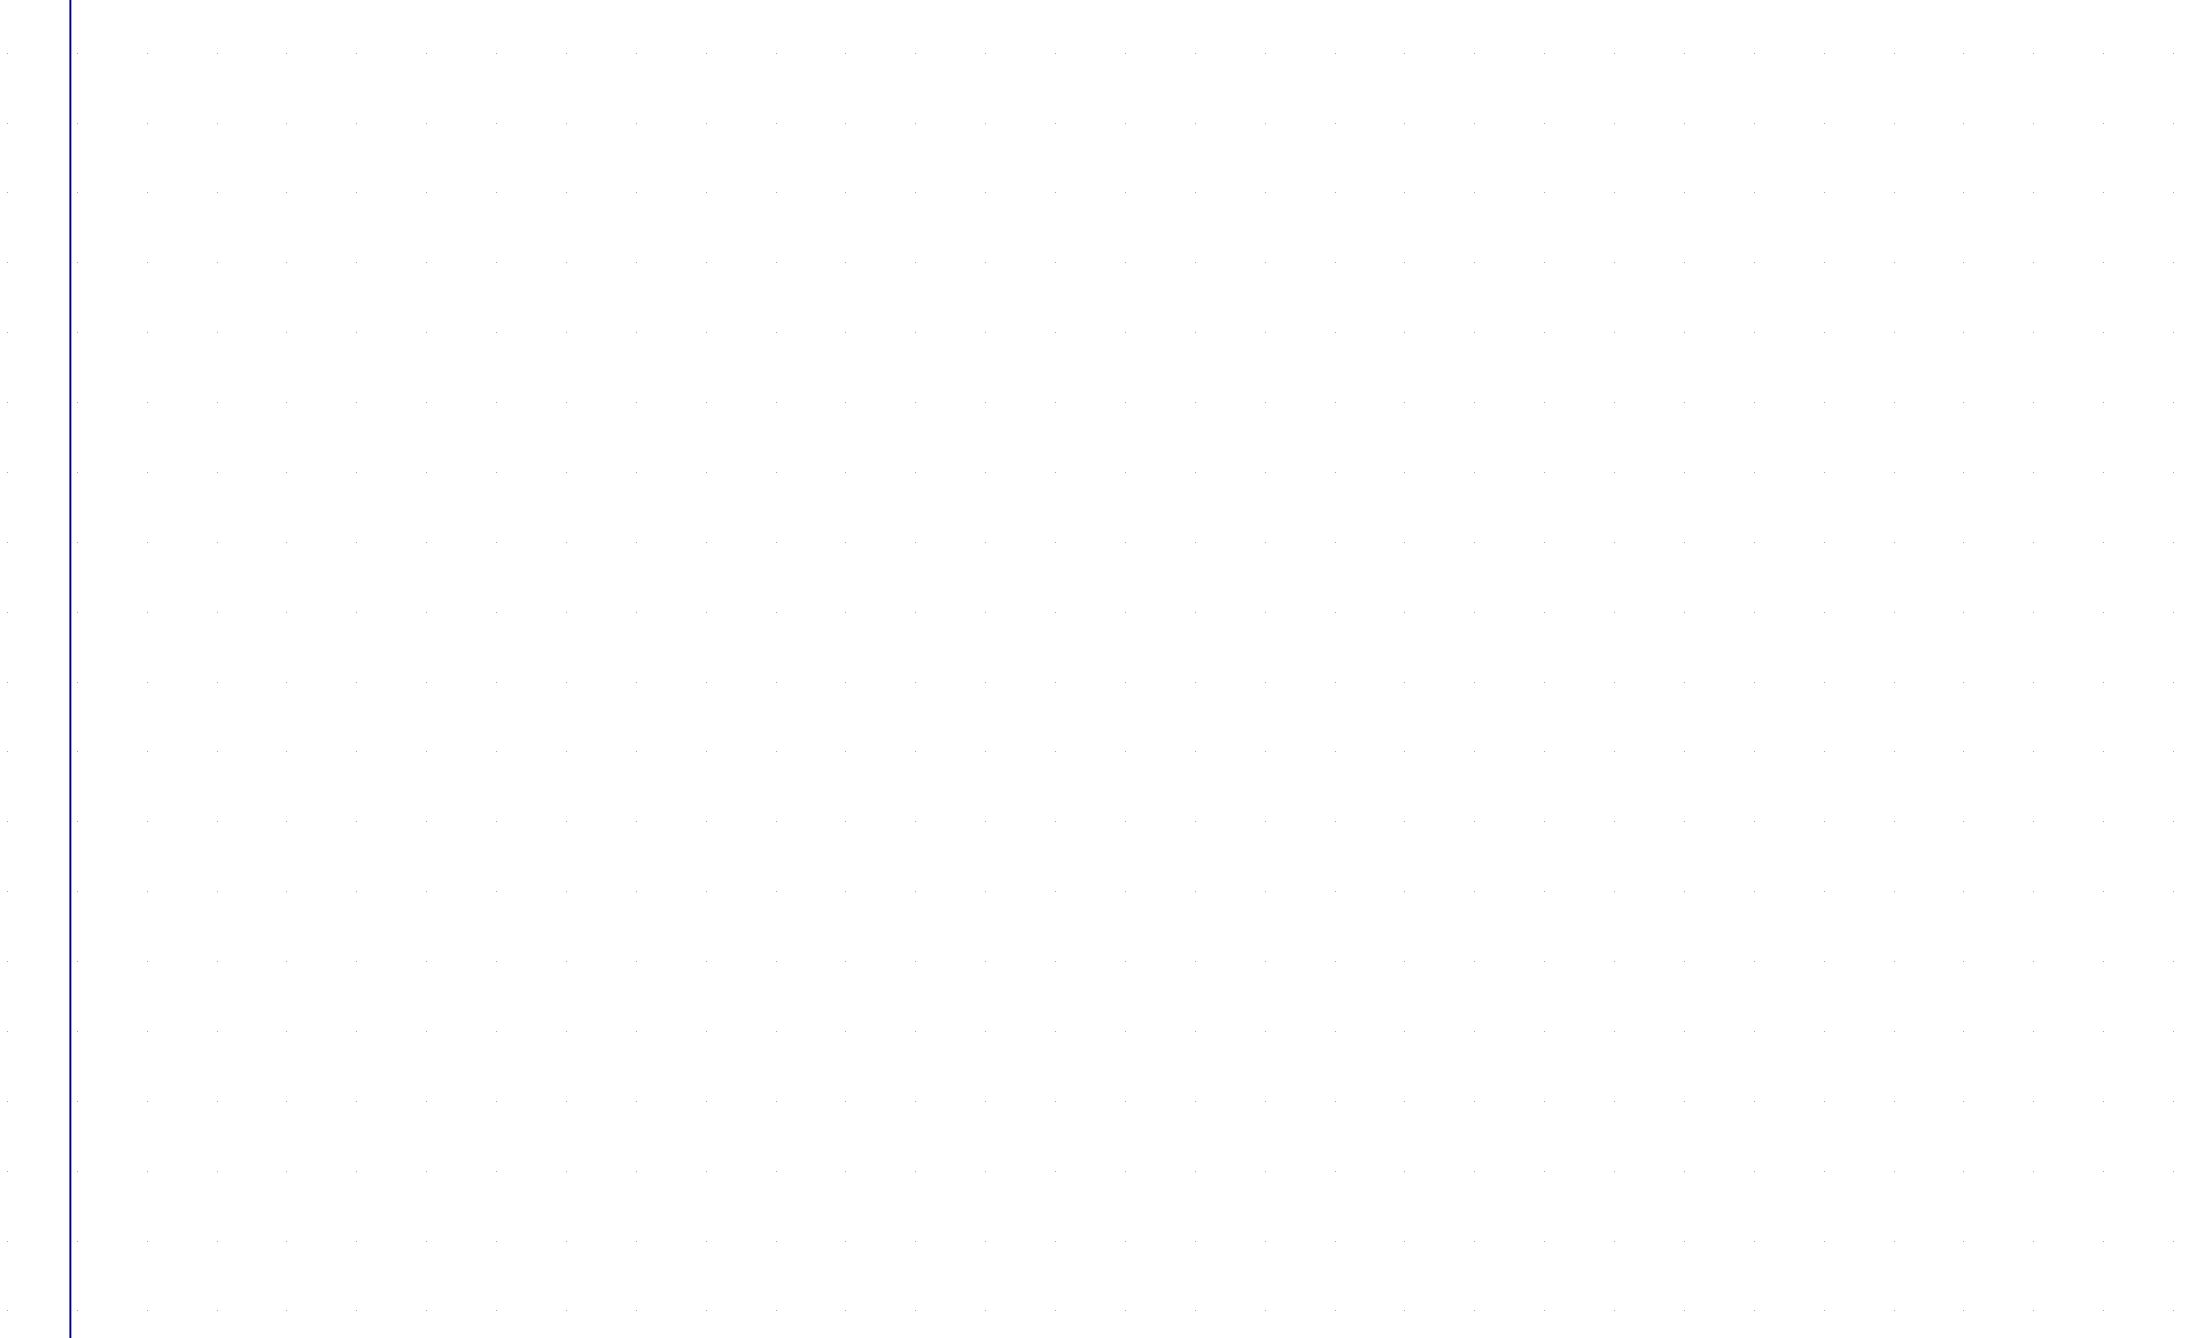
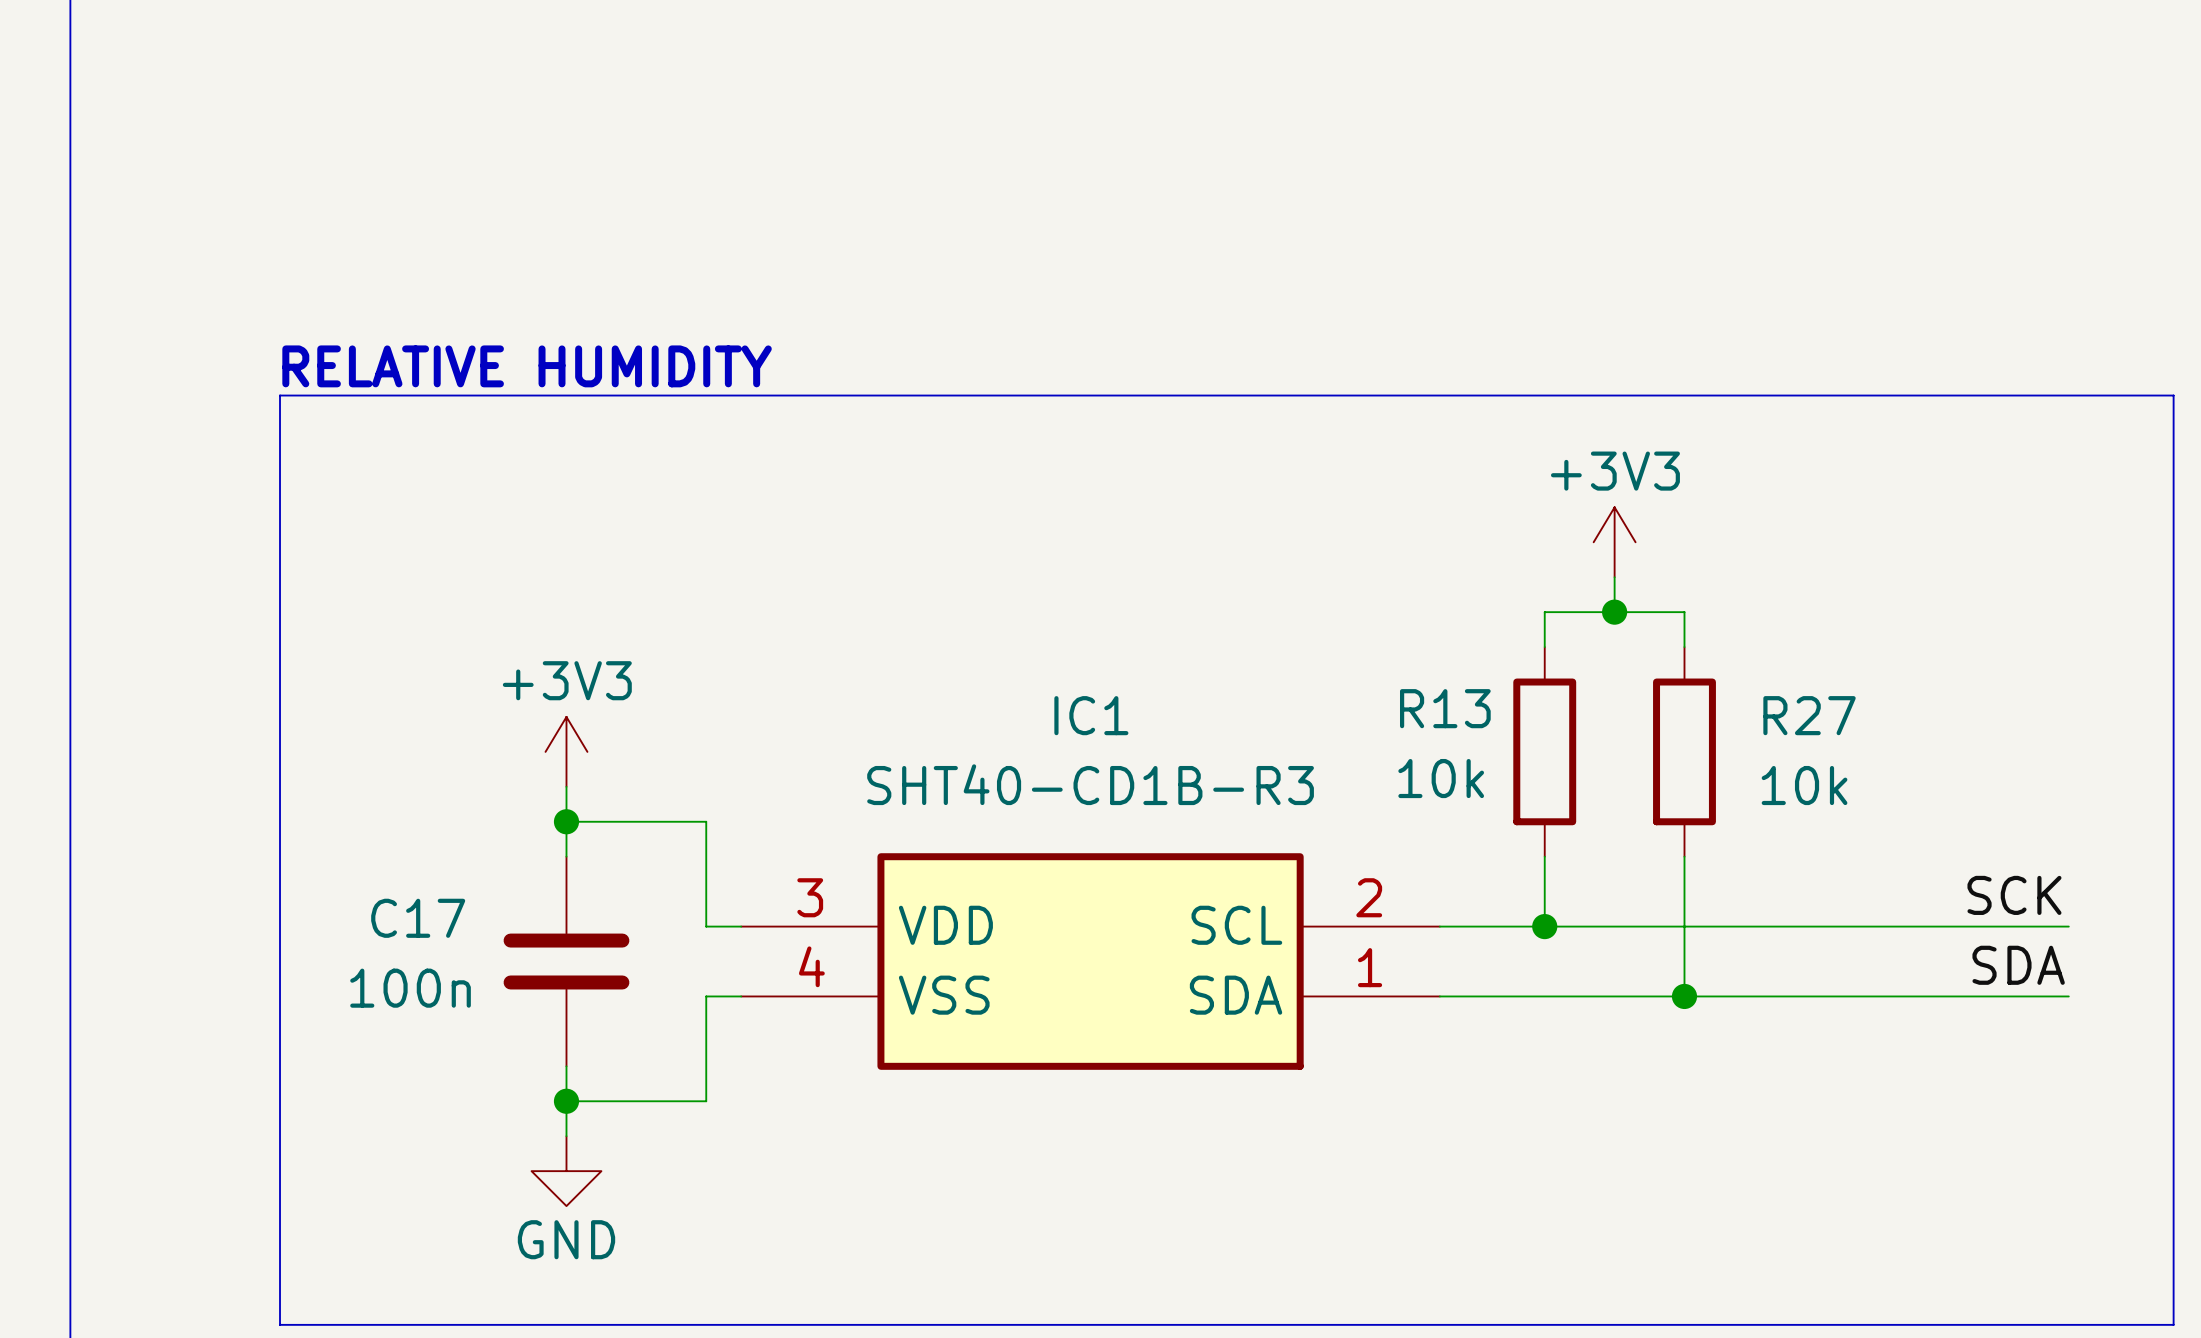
text: none -> RELATIVE HUMIDITY (527, 366)
line: none -> (280, 395) (280, 1324) (2173, 1324) (2173, 395) (280, 395)
power symbol: none -> +3V3 (1614, 542)
wire: none -> (1614, 577) (1614, 612)
junction: none -> (1614, 612)
wire: none -> (1544, 647) (1544, 612) (1684, 612) (1684, 647)
power symbol: none -> +3V3 (566, 751)
R13: none -> 10k (1544, 751)
R27: none -> 10k (1684, 751)
wire: none -> (566, 786) (566, 856)
wire: none -> (566, 821) (706, 821) (706, 926) (741, 926)
junction: none -> (566, 821)
wire: none -> (1544, 856) (1544, 926)
wire: none -> (1684, 856) (1684, 996)
label: none -> SCK (2014, 895)
wire: none -> (1439, 926) (2068, 926)
junction: none -> (1544, 926)
C17: none -> 100n (566, 961)
IC1: none -> SHT40-CD1B-R3 (1090, 961)
label: none -> SDA (2018, 965)
wire: none -> (741, 996) (706, 996) (706, 1101) (566, 1101)
wire: none -> (1439, 996) (2068, 996)
junction: none -> (1684, 996)
wire: none -> (566, 1066) (566, 1136)
junction: none -> (566, 1101)
power symbol: none -> GND (566, 1171)

